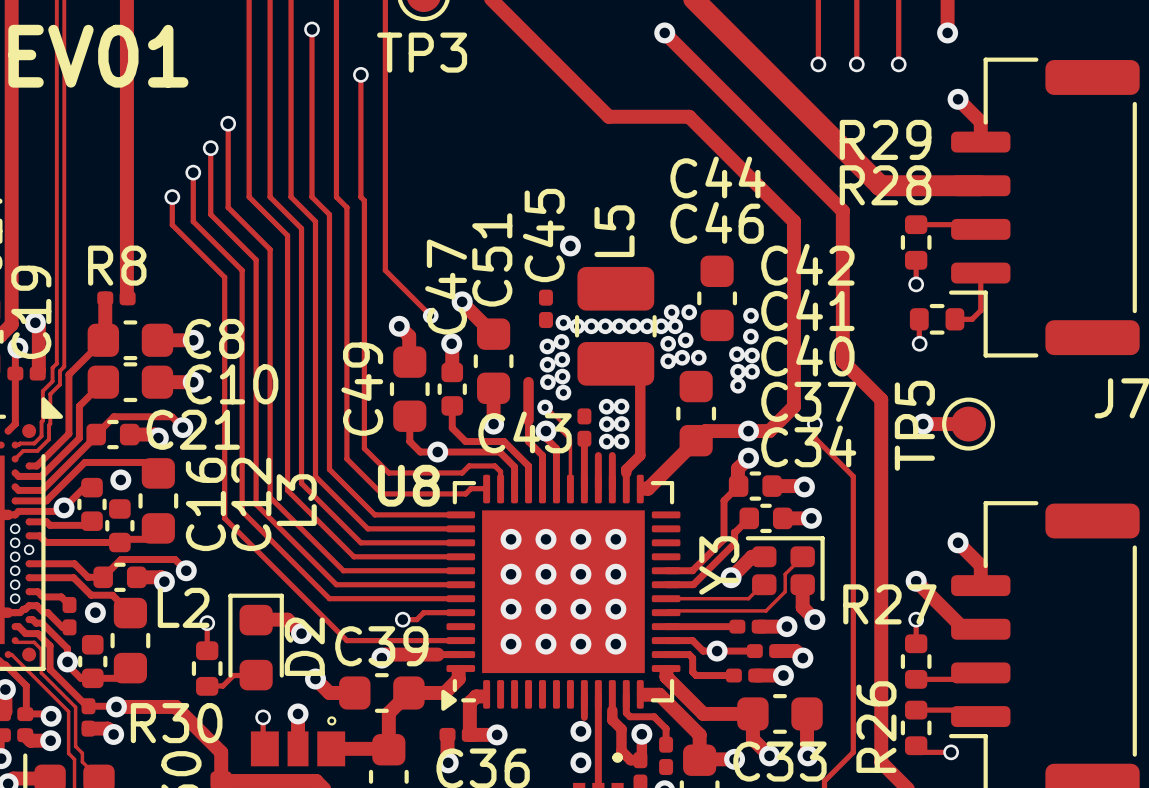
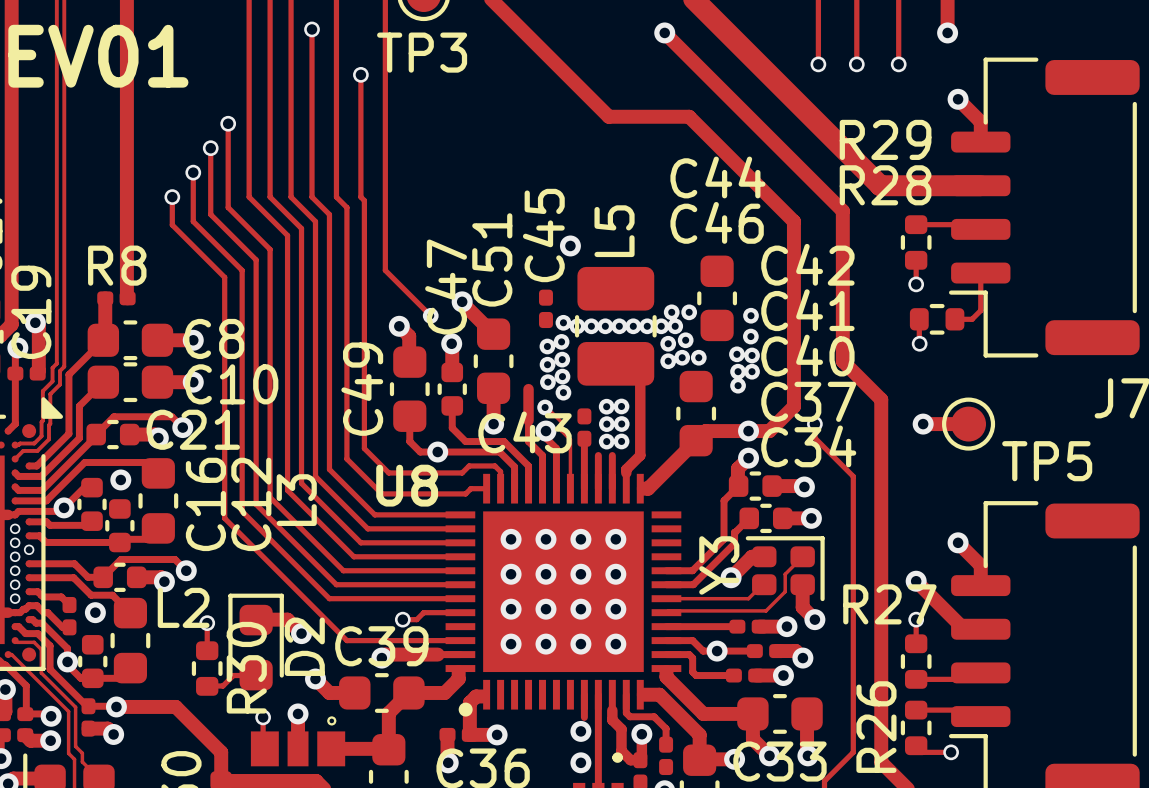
track: (528, 382) (528, 389) -> none
TP5 name rotation: 0° (914, 425) -> 90° clockwise (1047, 461)
TP5 name position: TP5 (914, 425) -> TP5 (1047, 461)
U8 footprint: [441, 474, 681, 711] -> [445, 473, 682, 717]
R30 name rotation: 0° (176, 723) -> 90° counterclockwise (246, 667)

